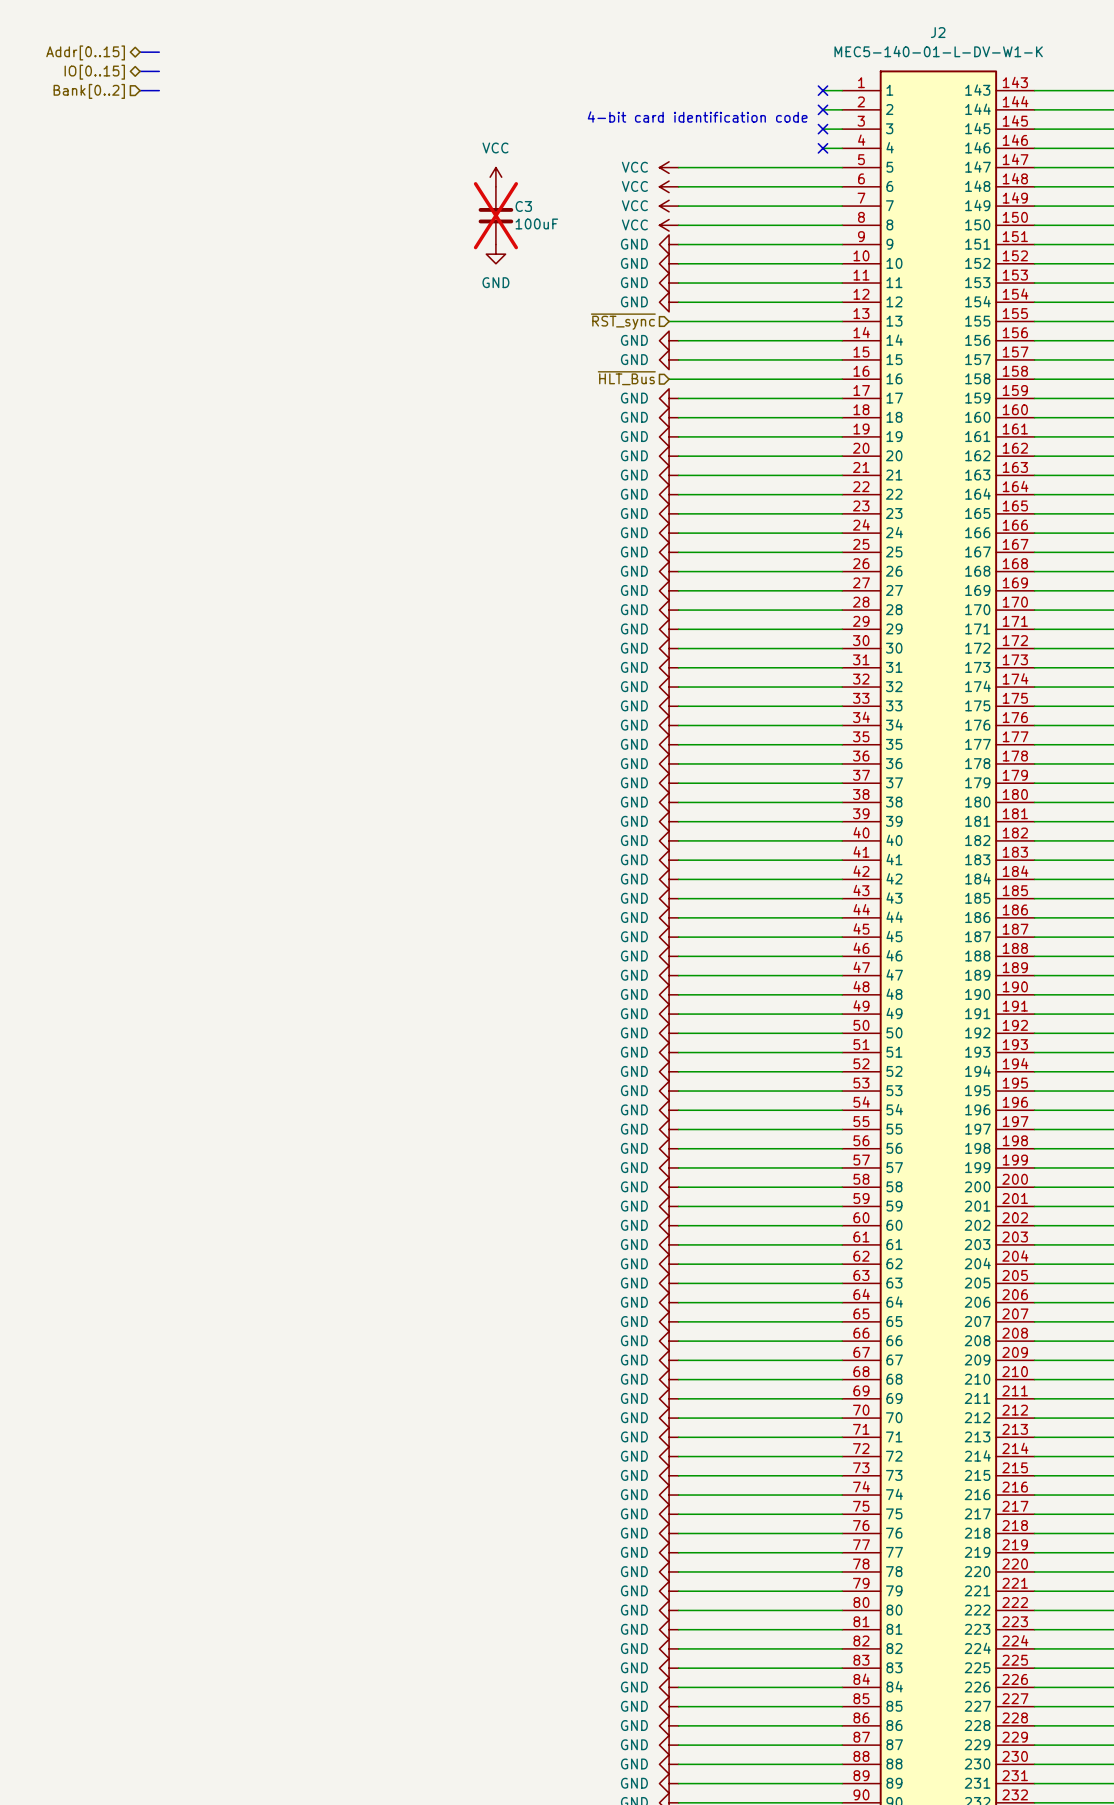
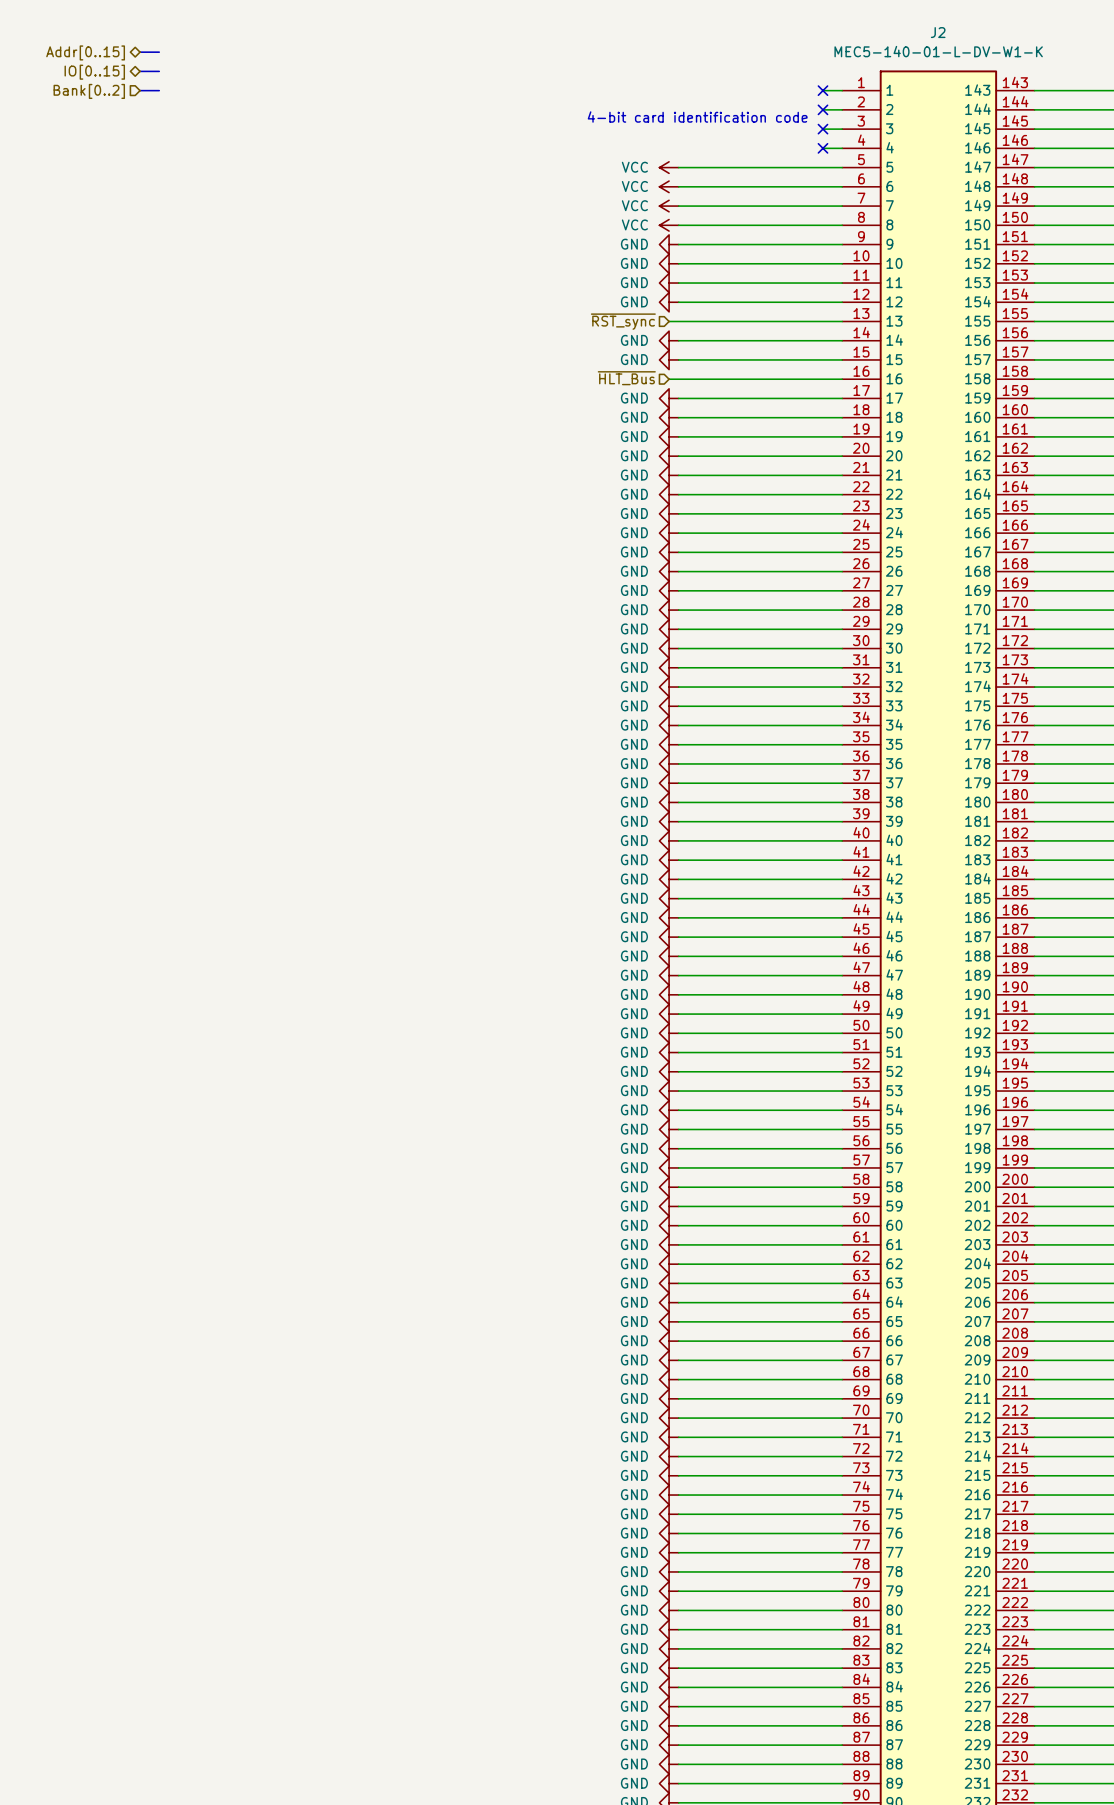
power symbol: VCC (495, 177) -> none
C3: 100uF (495, 215) -> none
power symbol: GND (495, 254) -> none

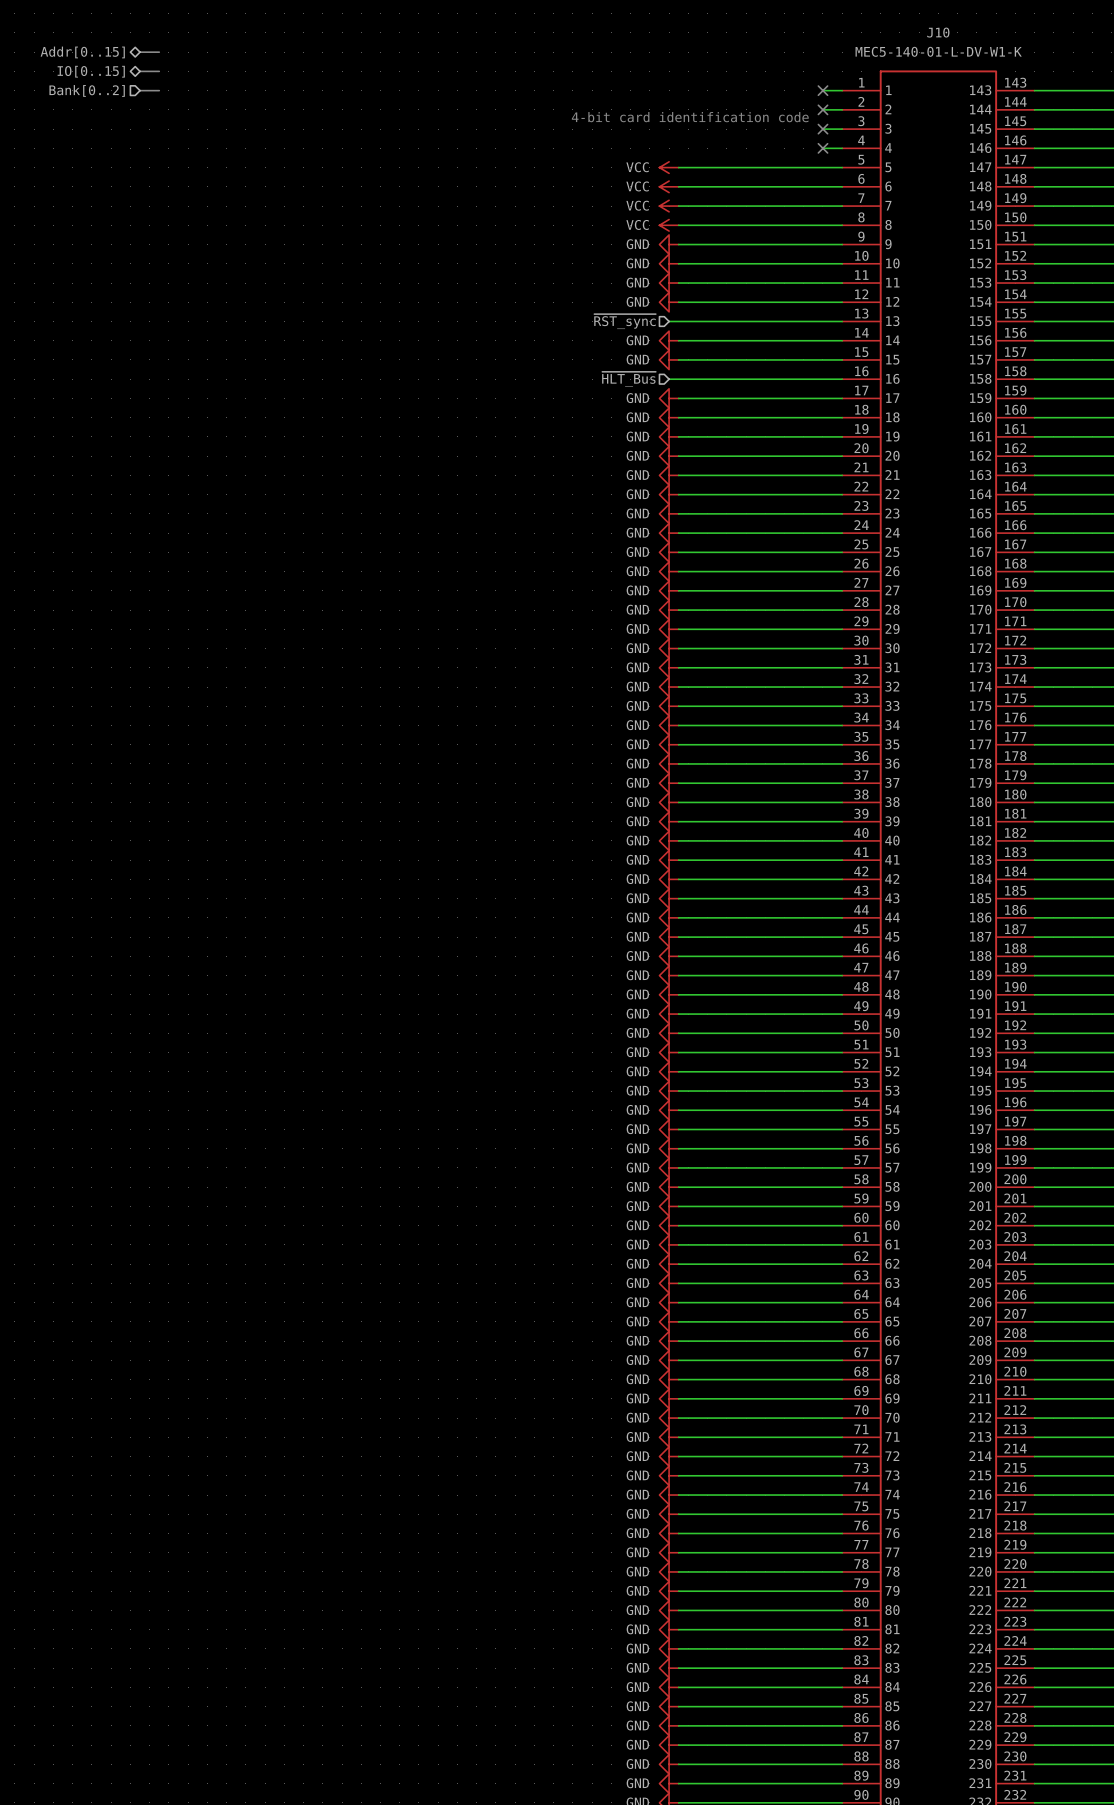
J2 name: J2 (938, 32) -> J10 (938, 32)

